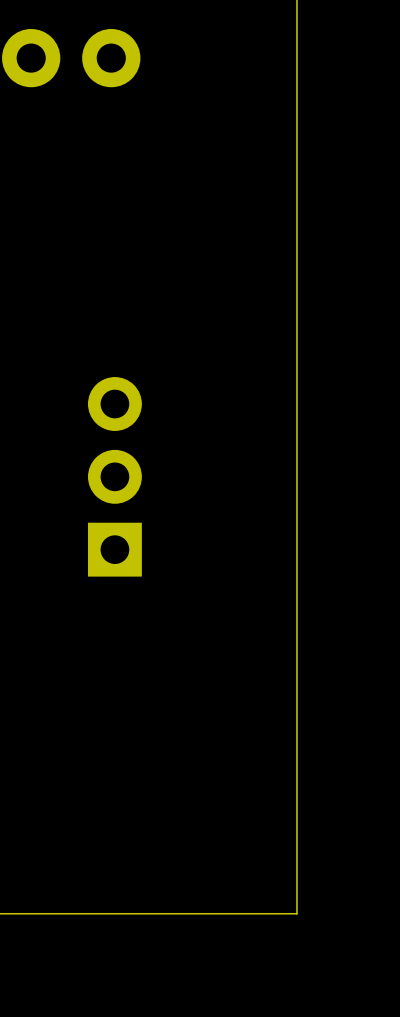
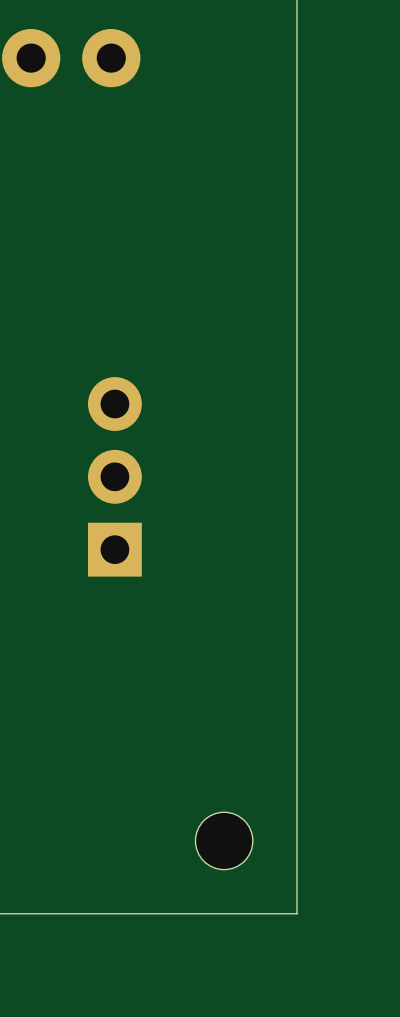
hole: none -> (224, 840)

